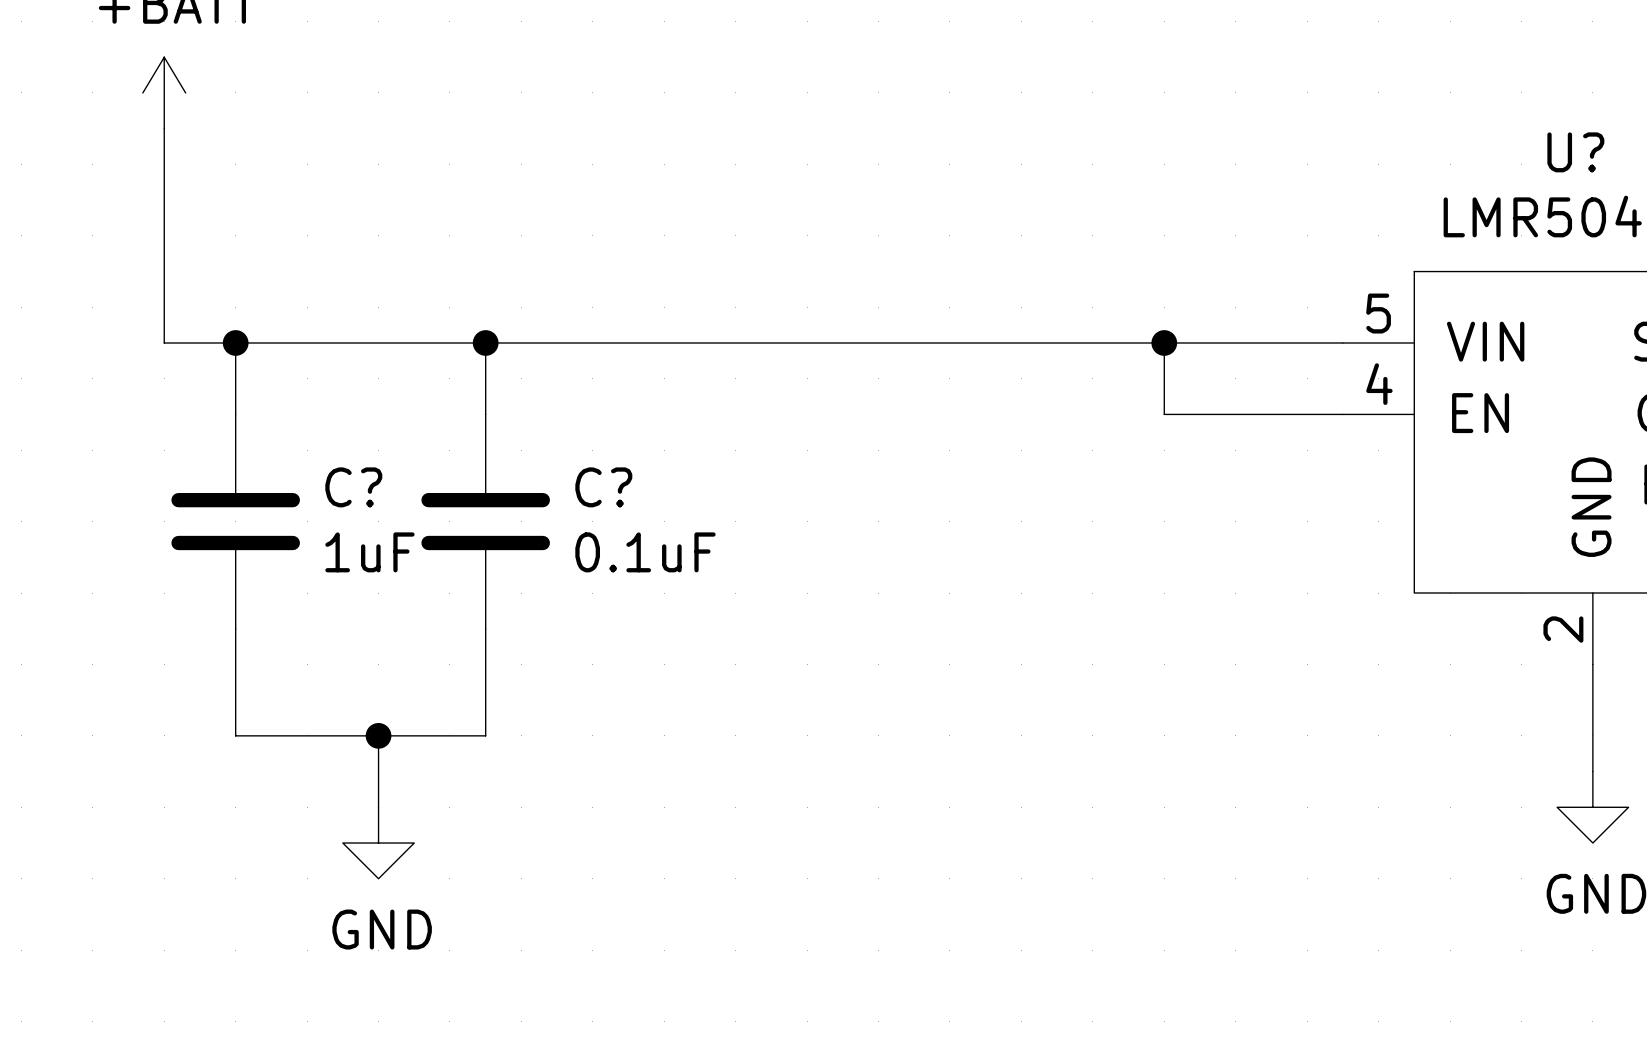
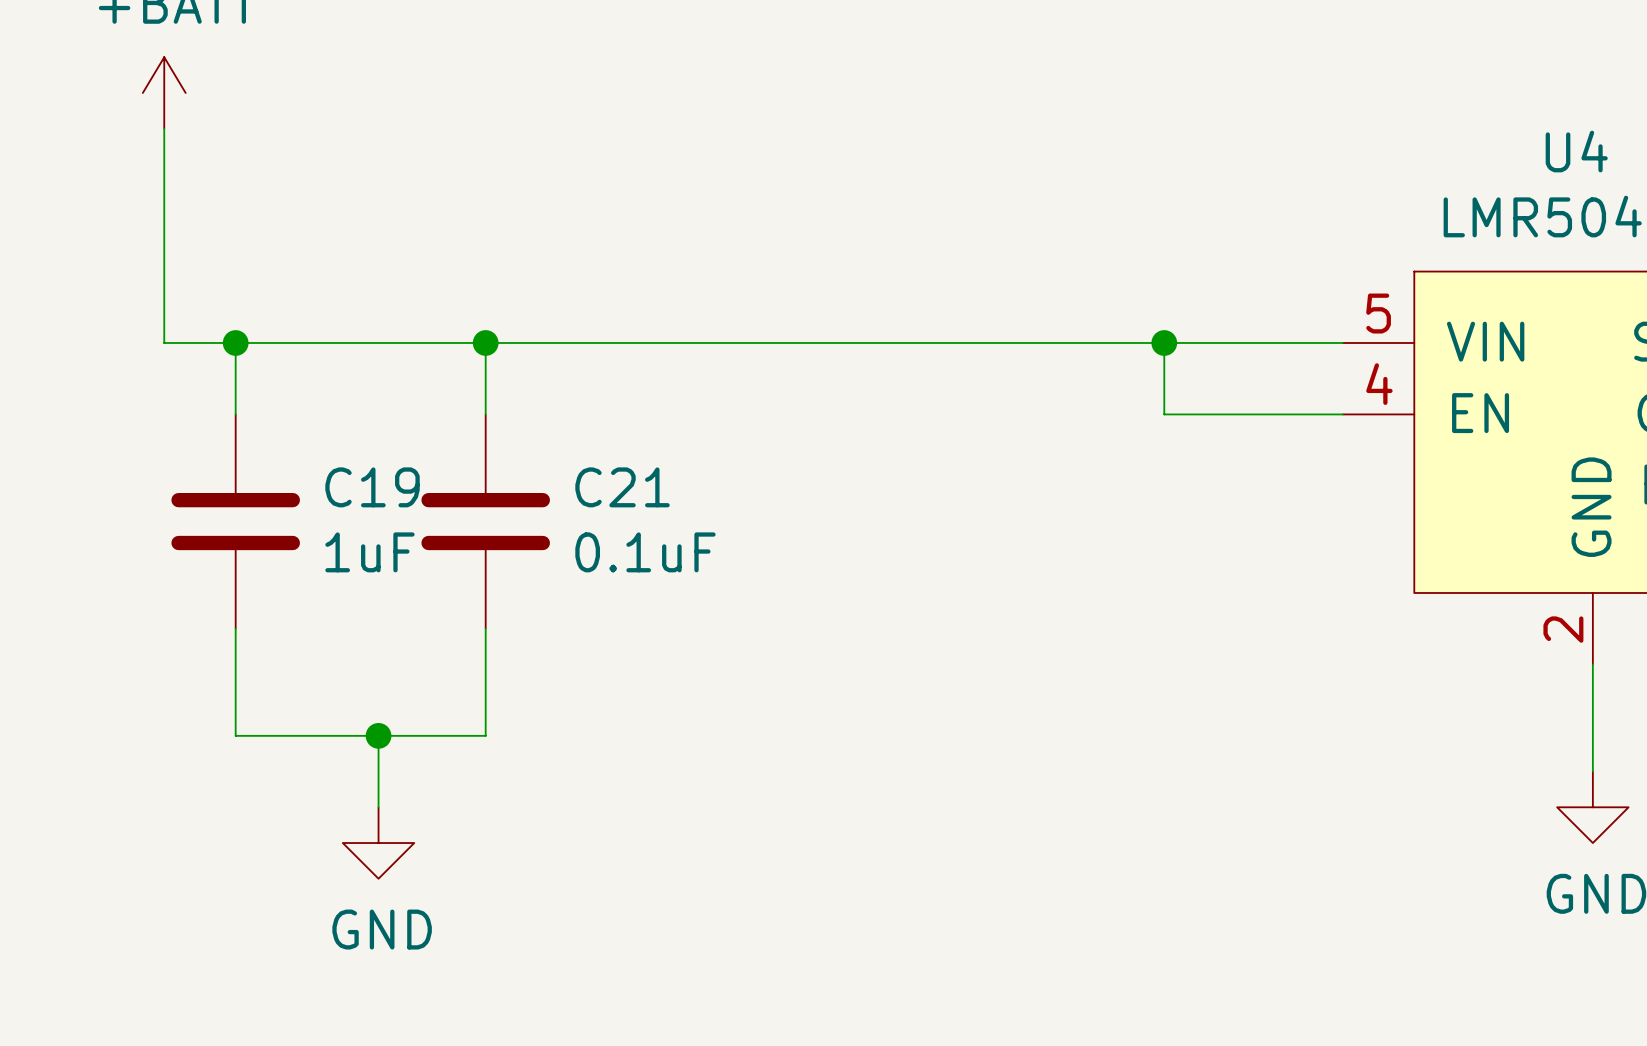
U? name: U? (1575, 152) -> U4 (1576, 151)
C? name: C? (353, 487) -> C19 (372, 487)
C? name: C? (603, 487) -> C21 (622, 487)

